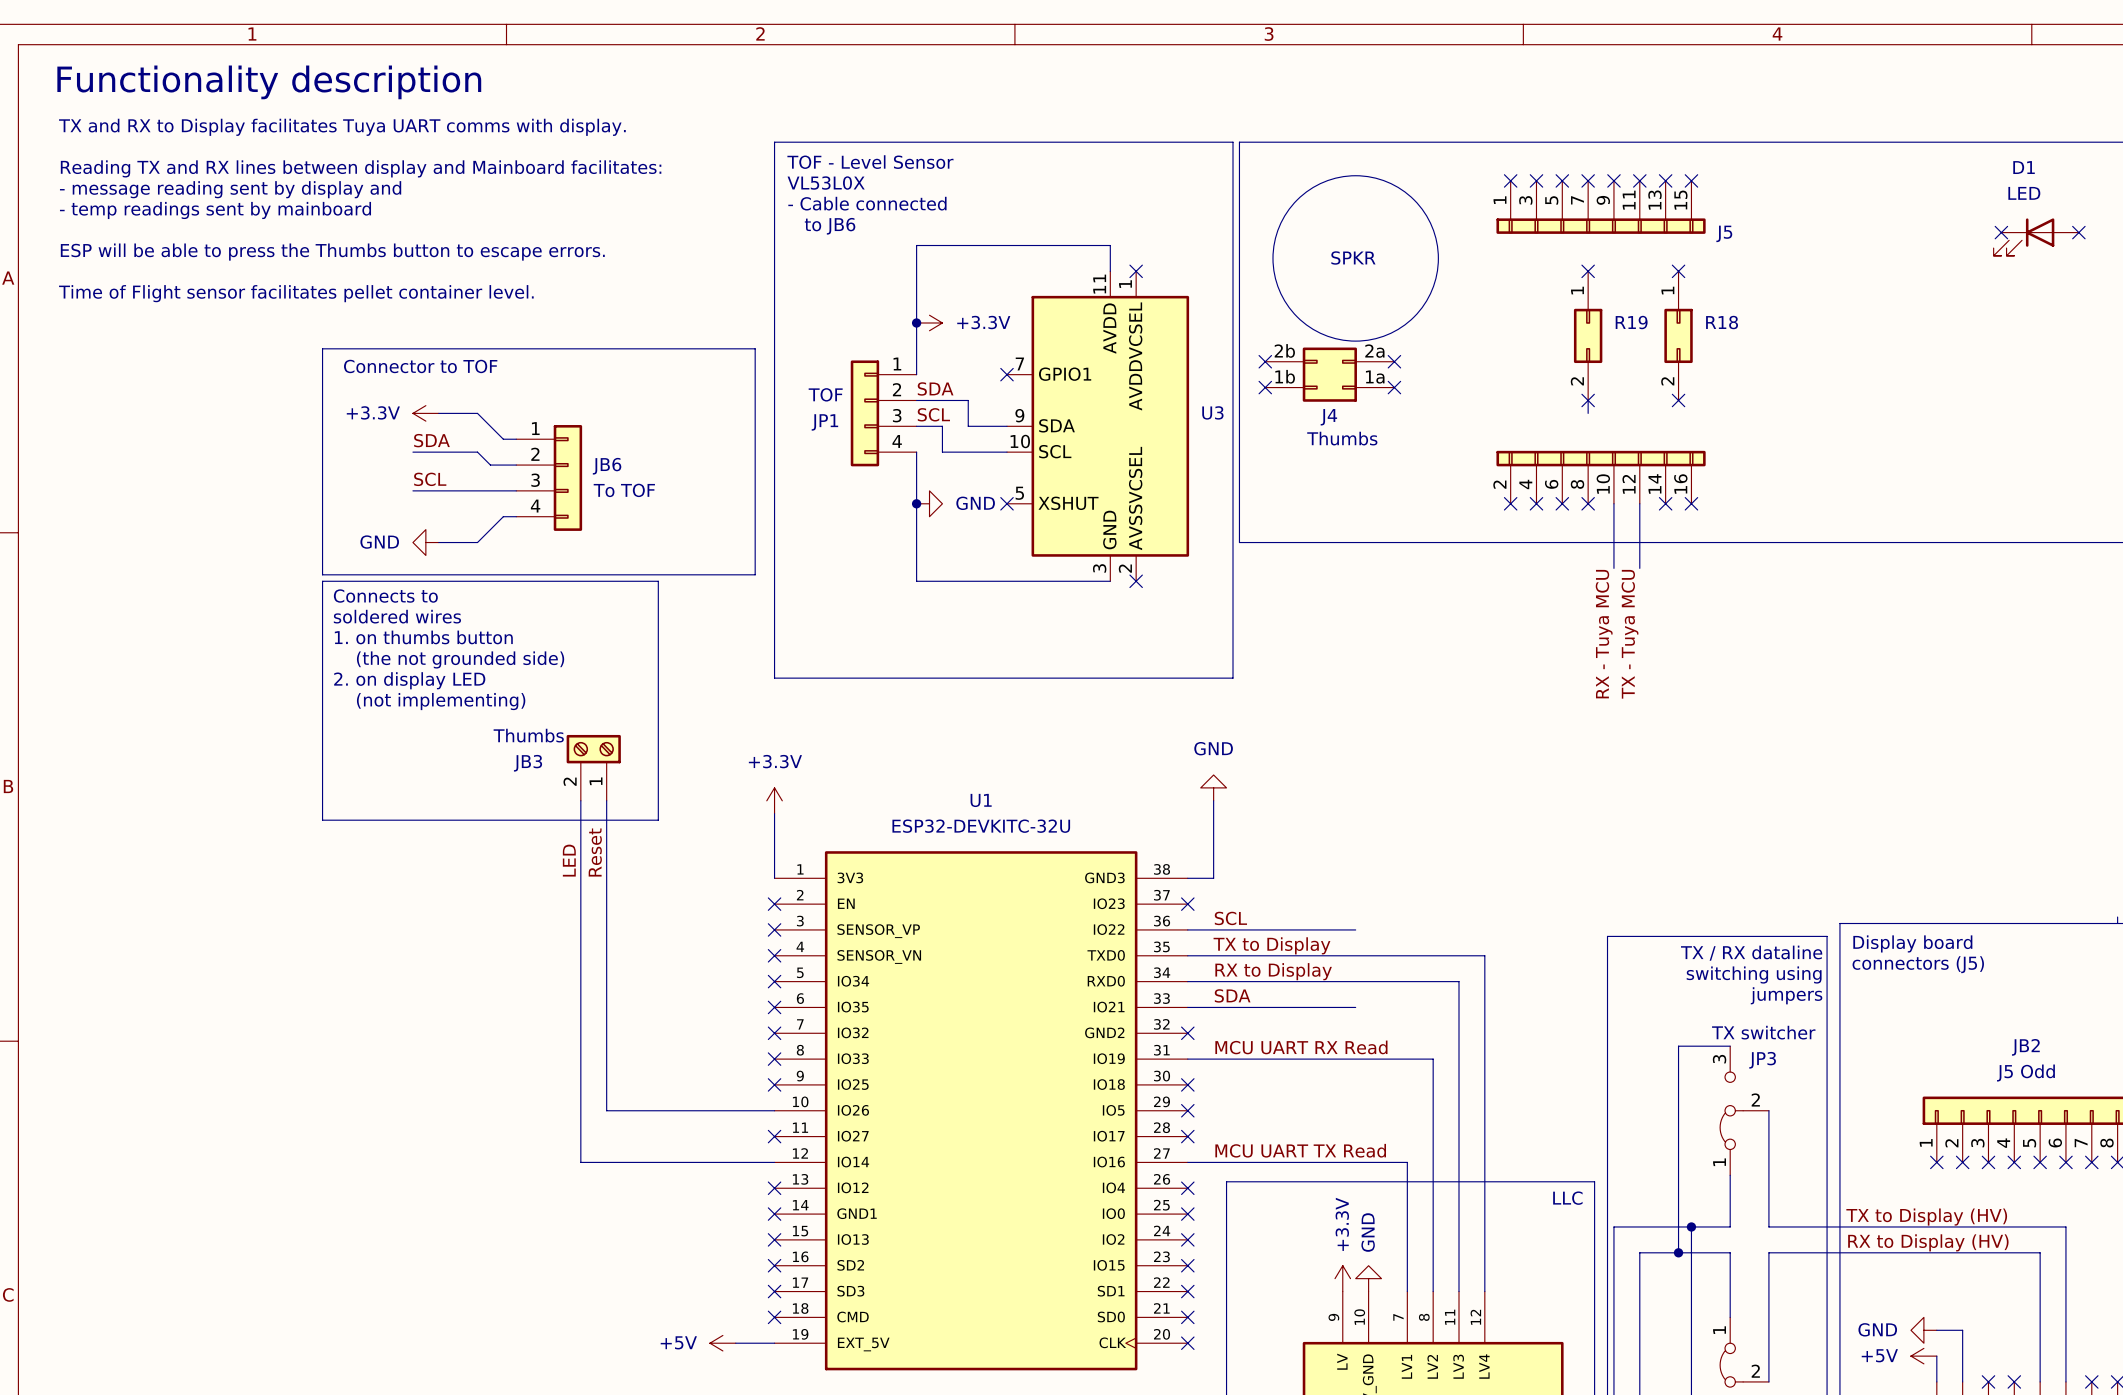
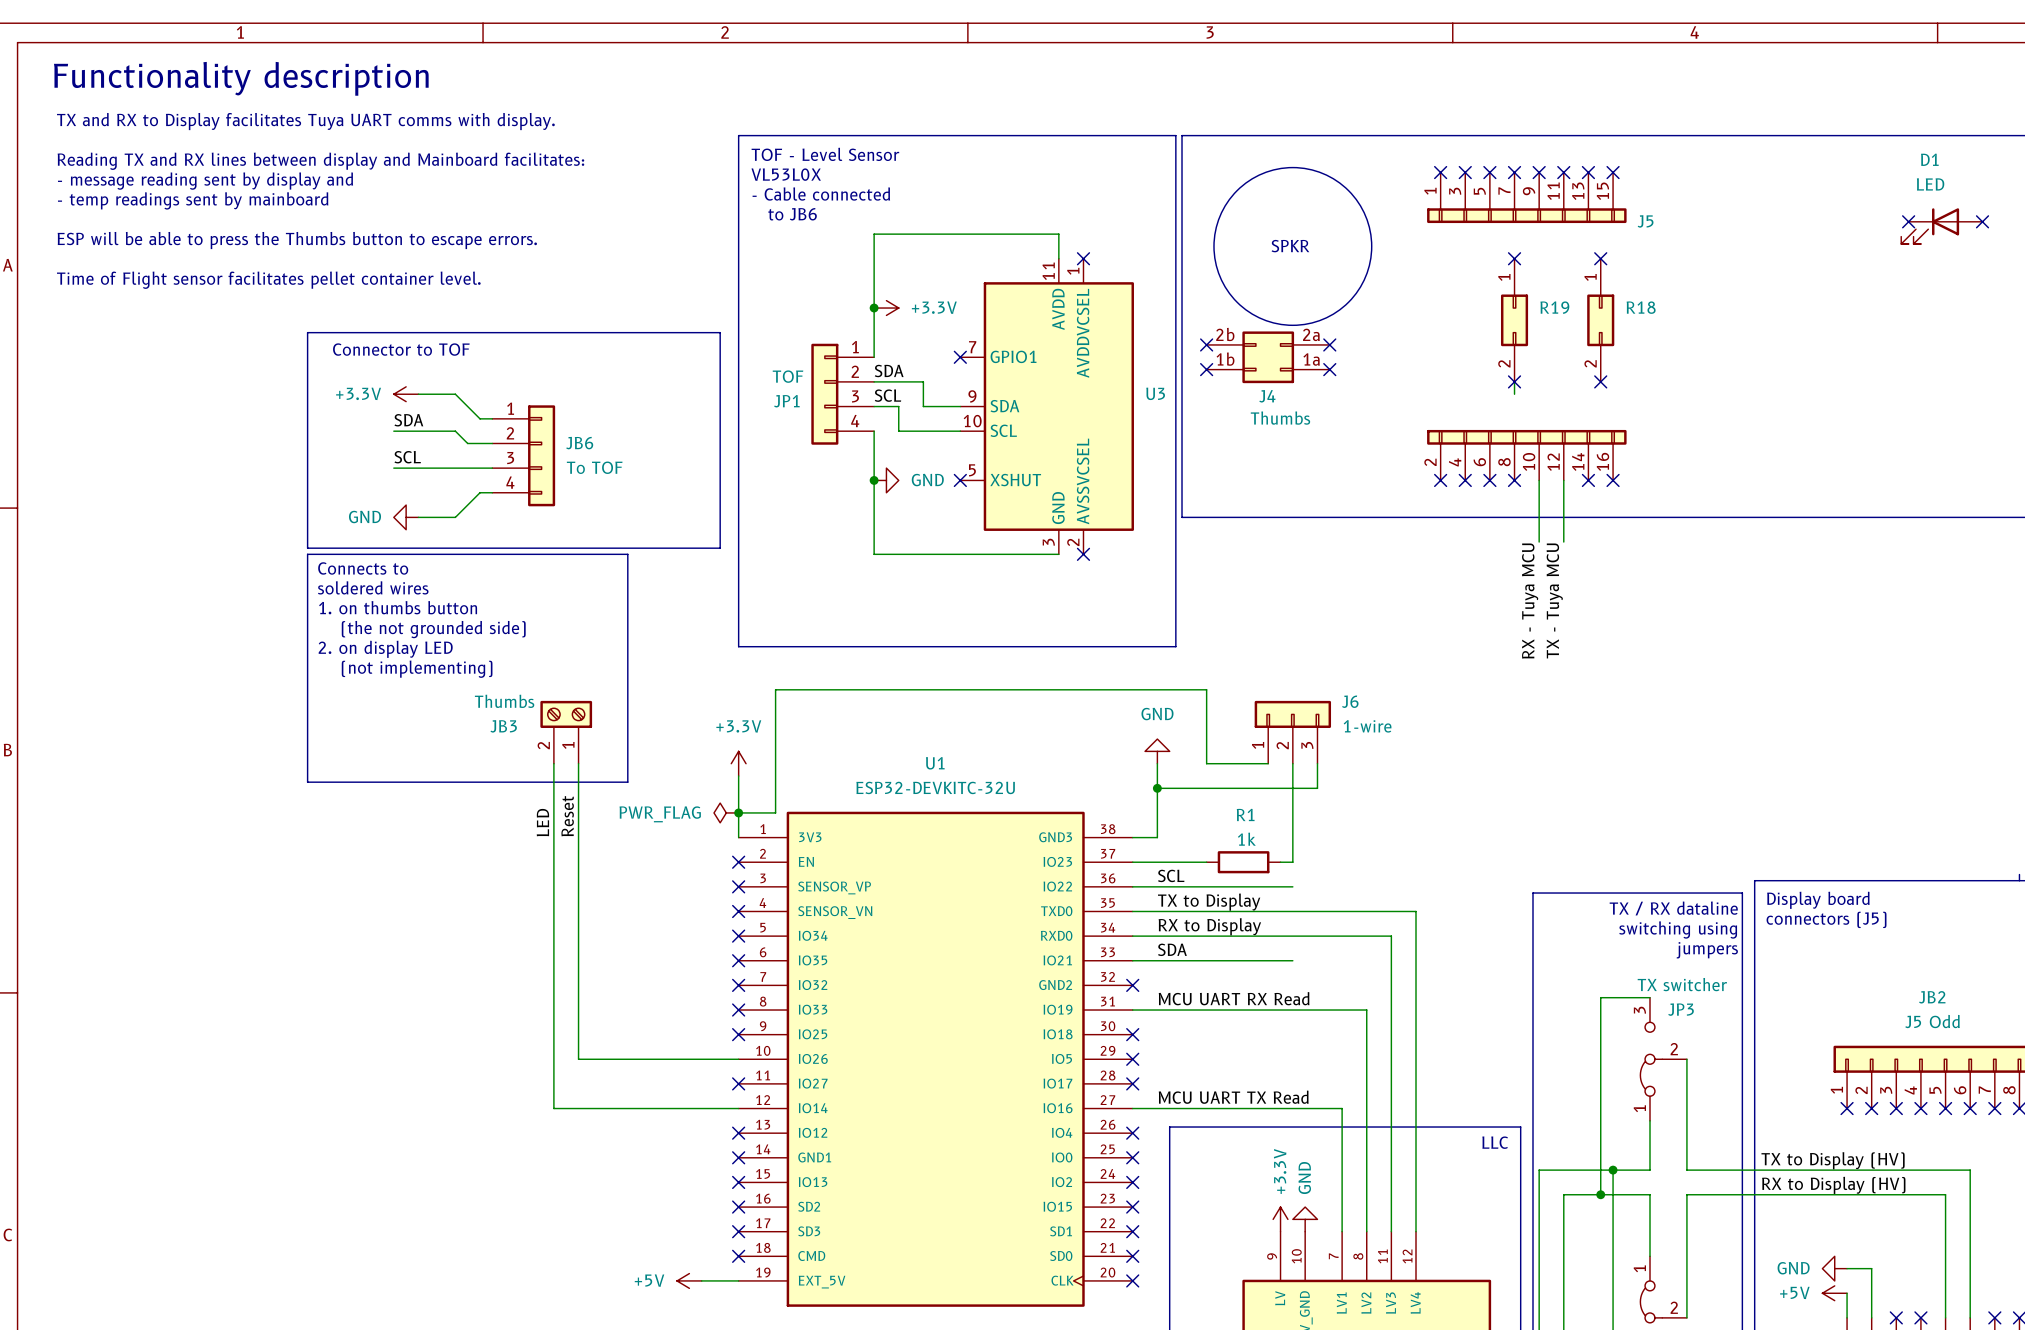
J6: none -> 1-wire (1292, 732)
wire: none -> (1268, 763) (1206, 763) (1206, 689) (775, 689) (775, 812) (738, 812)
wire: none -> (1292, 763) (1292, 862) (1280, 862)
wire: none -> (1317, 763) (1317, 788) (1157, 788)
junction: none -> (1157, 788)
power symbol: none -> PWR_FLAG (726, 812)
junction: none -> (738, 812)
wire: none -> (1132, 862) (1206, 862)
no-connect mark: (1187, 904) -> none
R1: none -> 1k (1243, 862)

